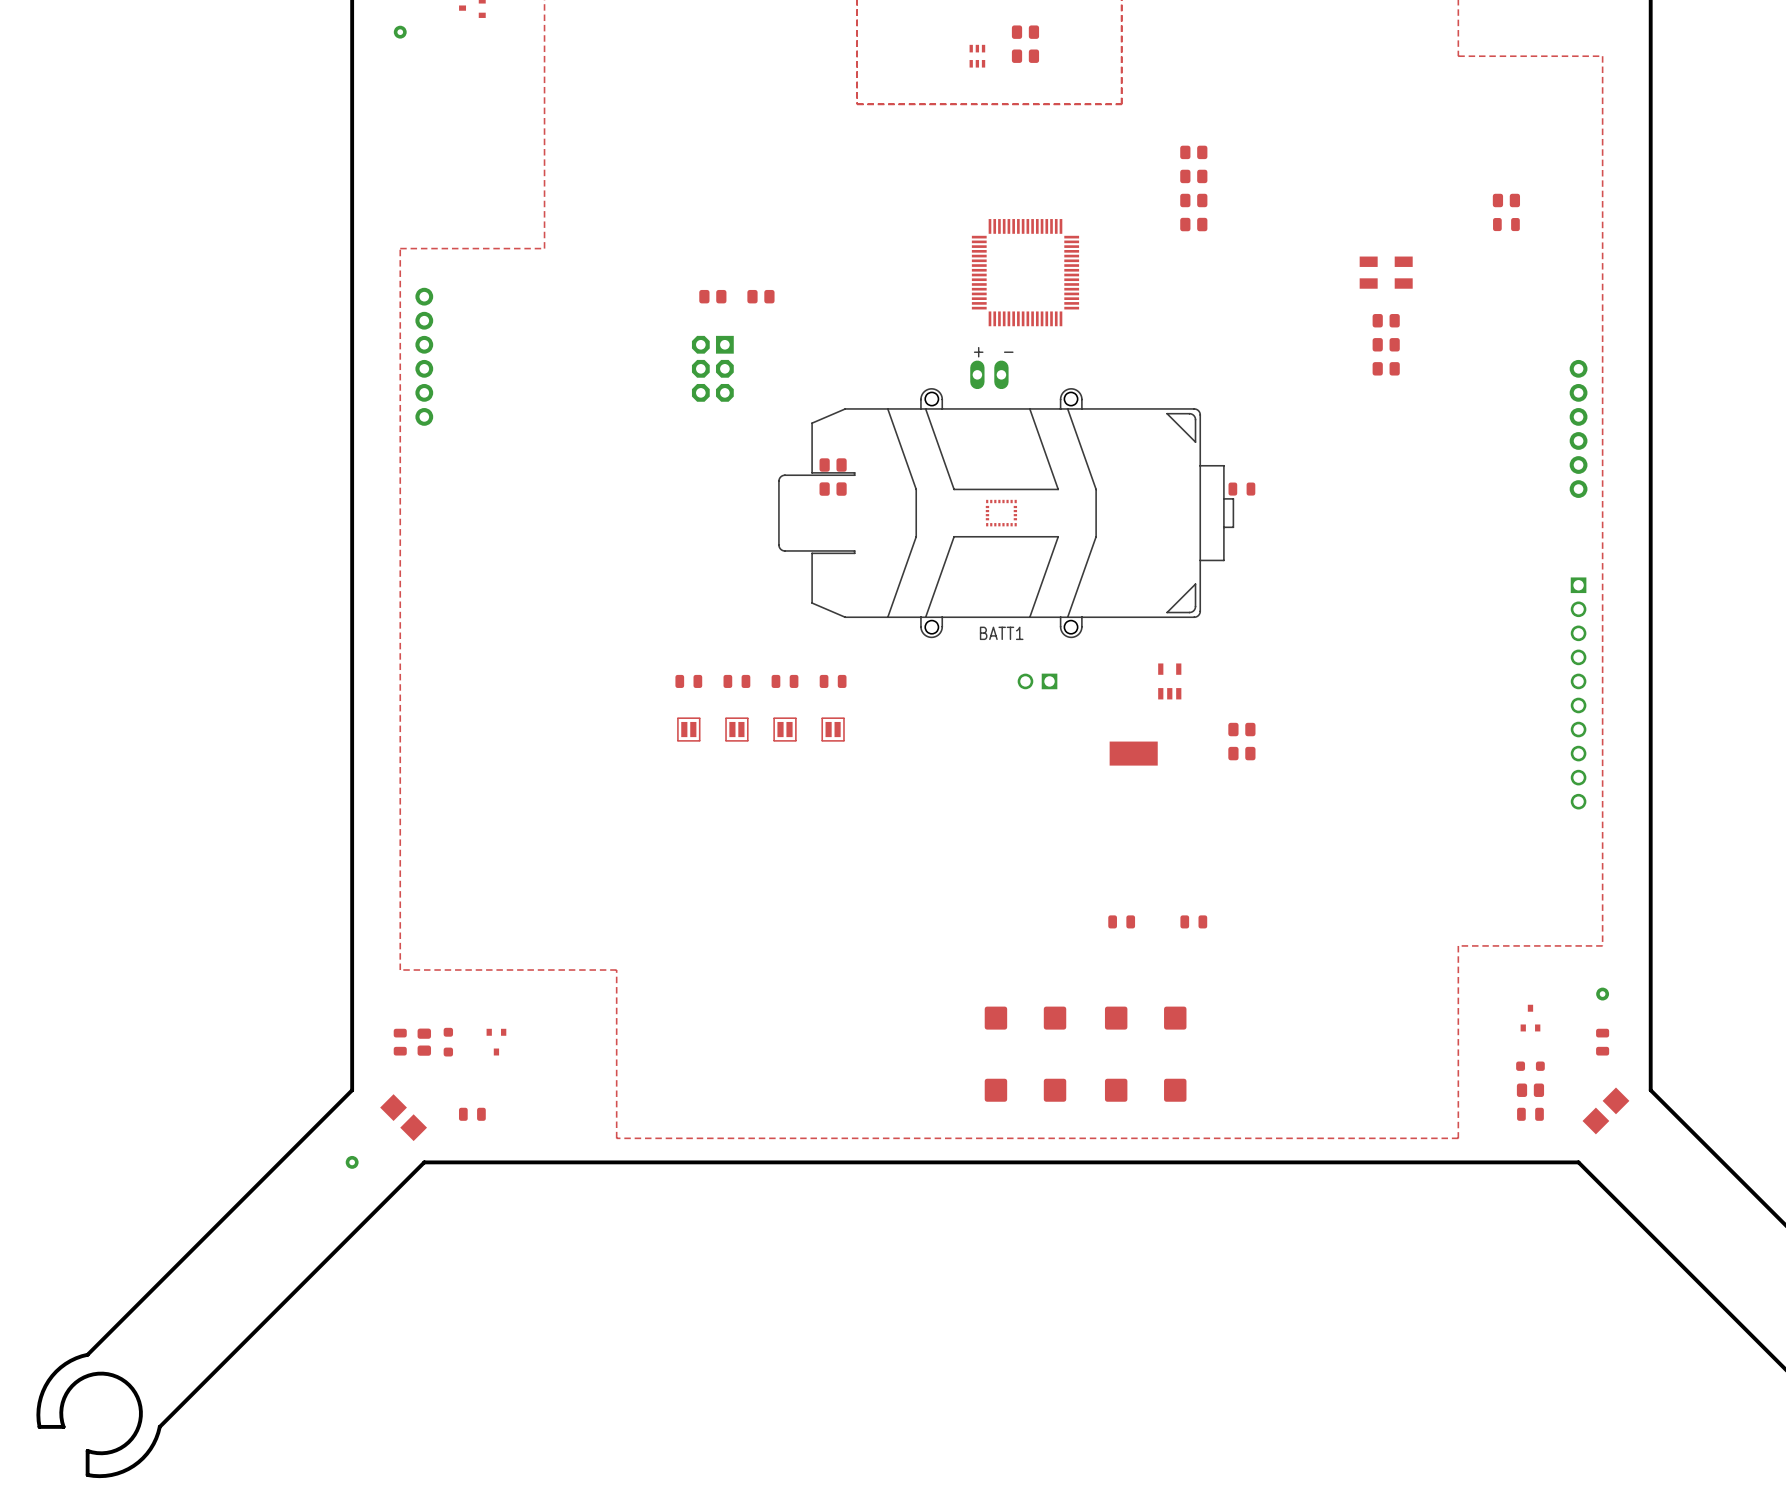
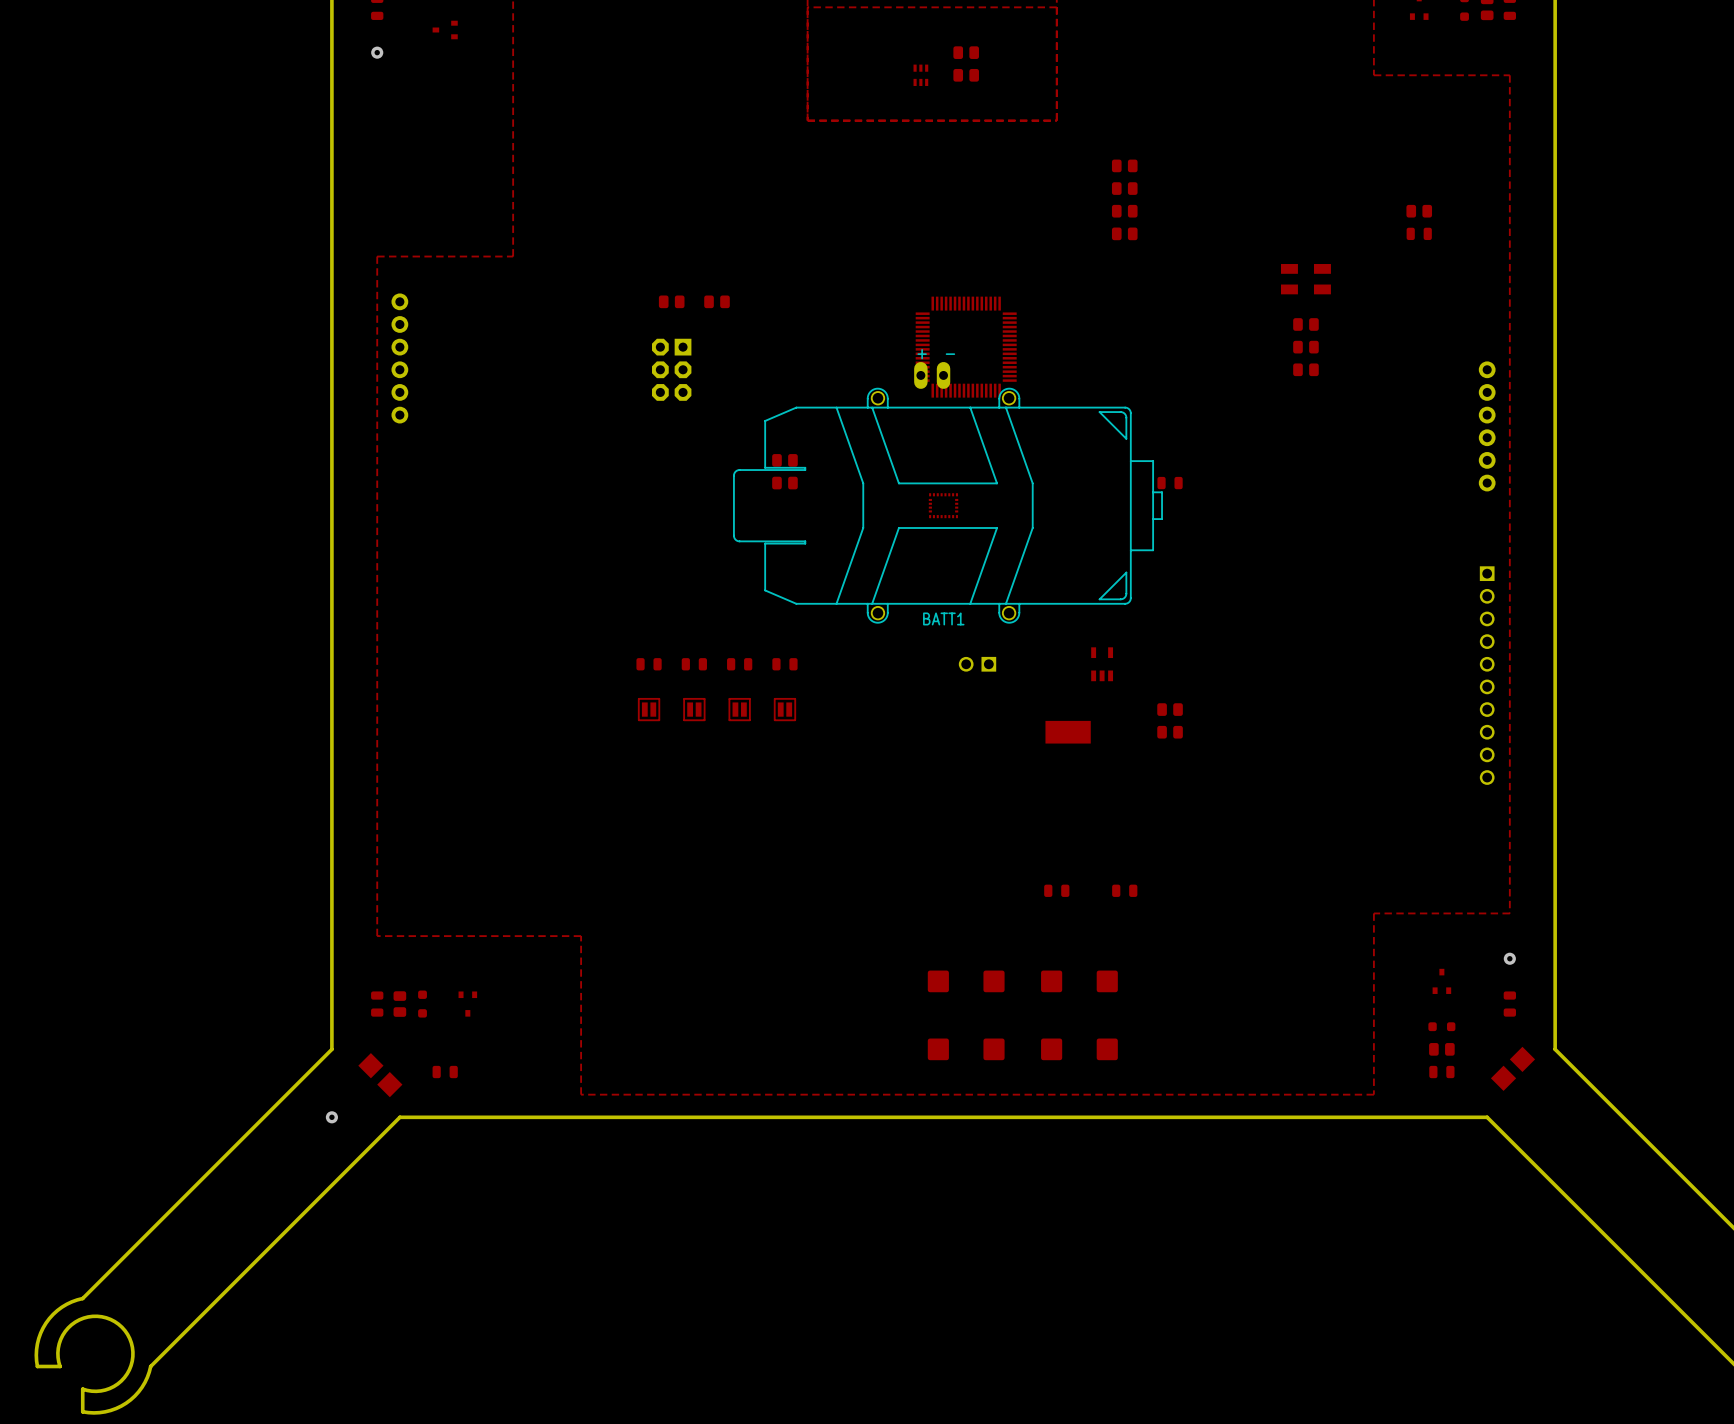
part position: (1025, 272) -> (966, 347)

